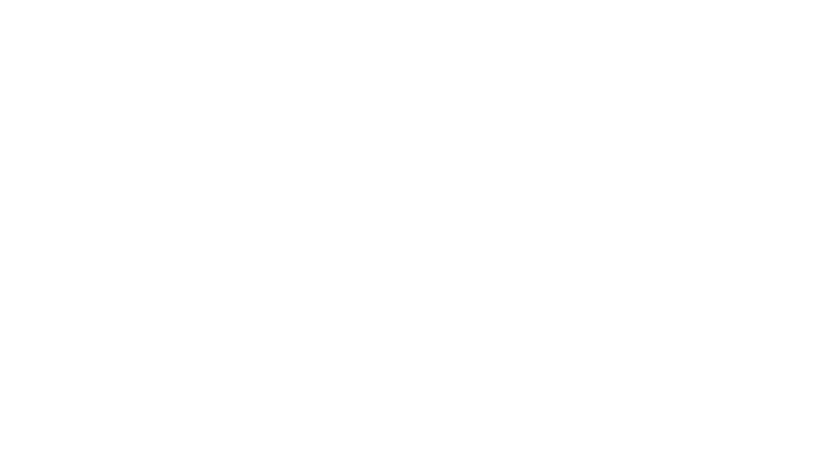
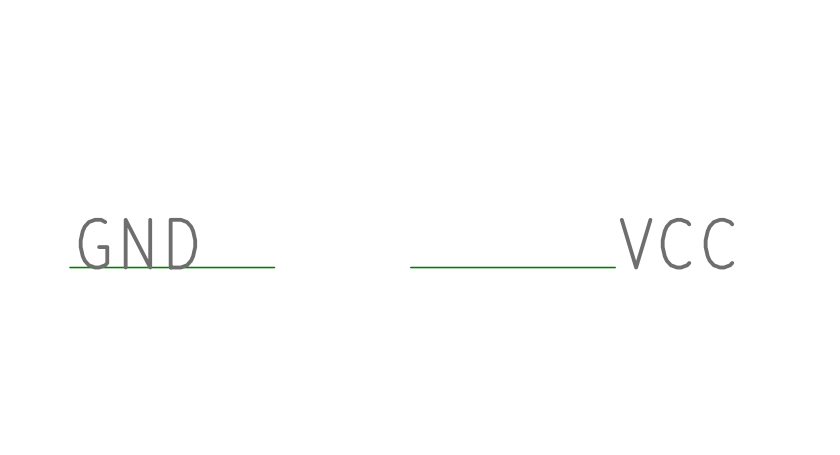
label: none -> GND (137, 243)
label: none -> VCC (677, 243)
wire: none -> (70, 267) (274, 267)
wire: none -> (410, 267) (615, 267)

